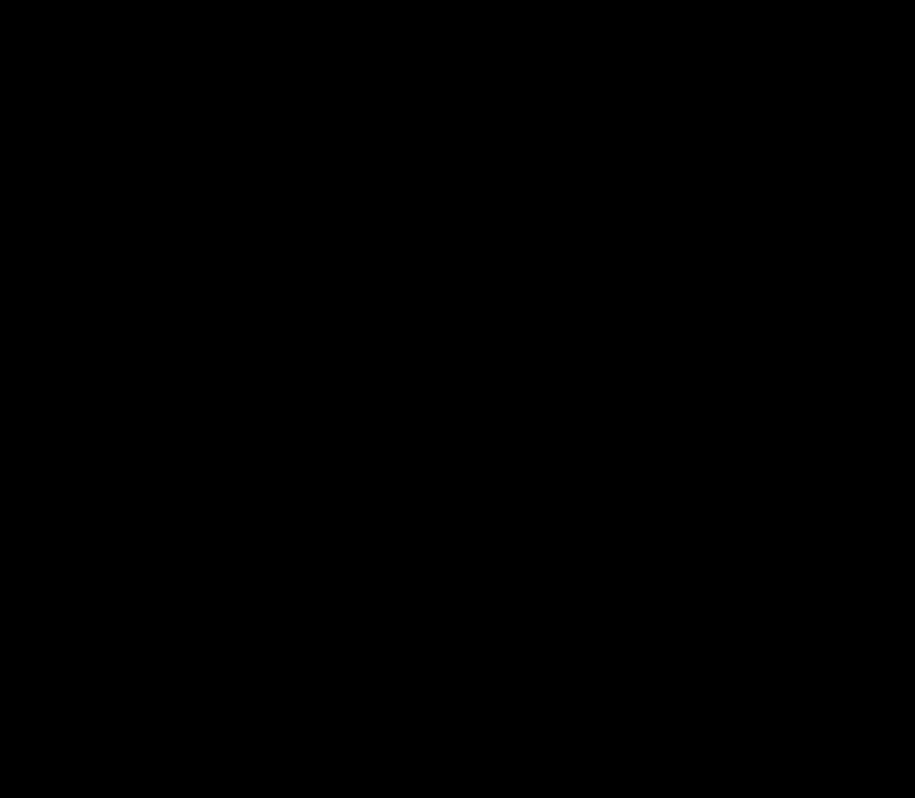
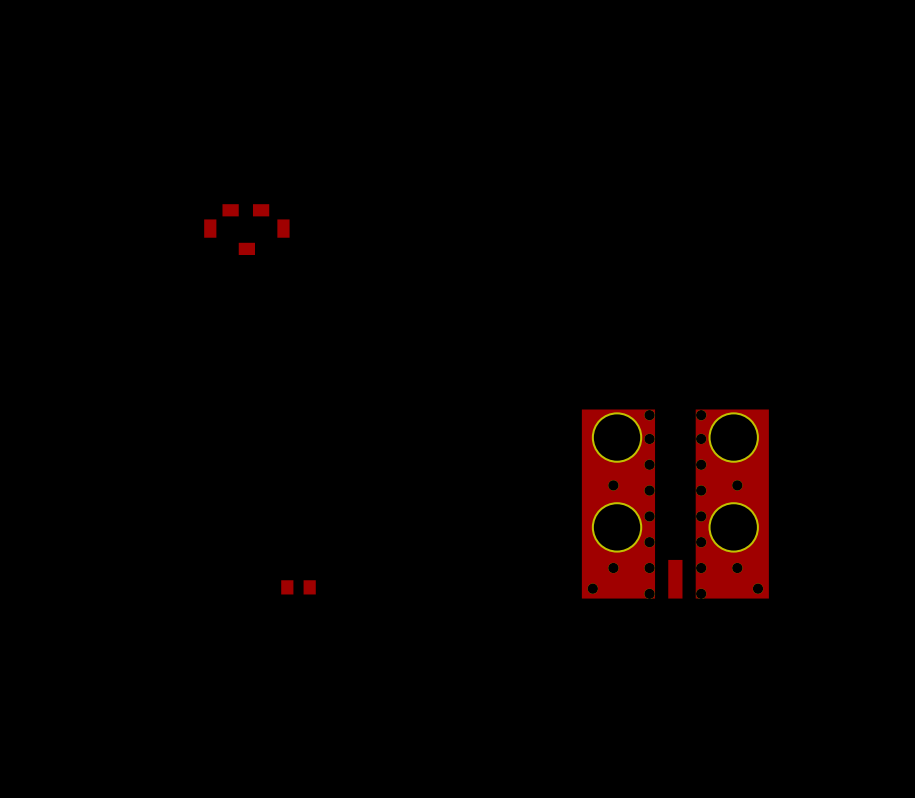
part: none -> (246, 229)
part: none -> (675, 504)
part: none -> (298, 587)

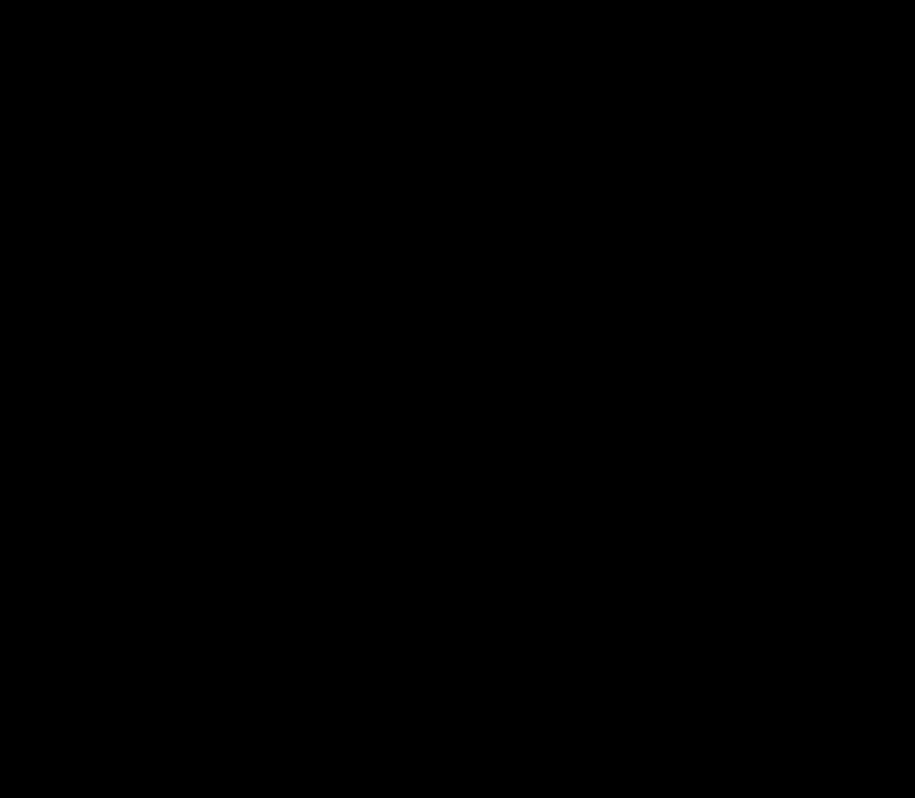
part: (246, 229) -> none
part: (675, 504) -> none
part: (298, 587) -> none

